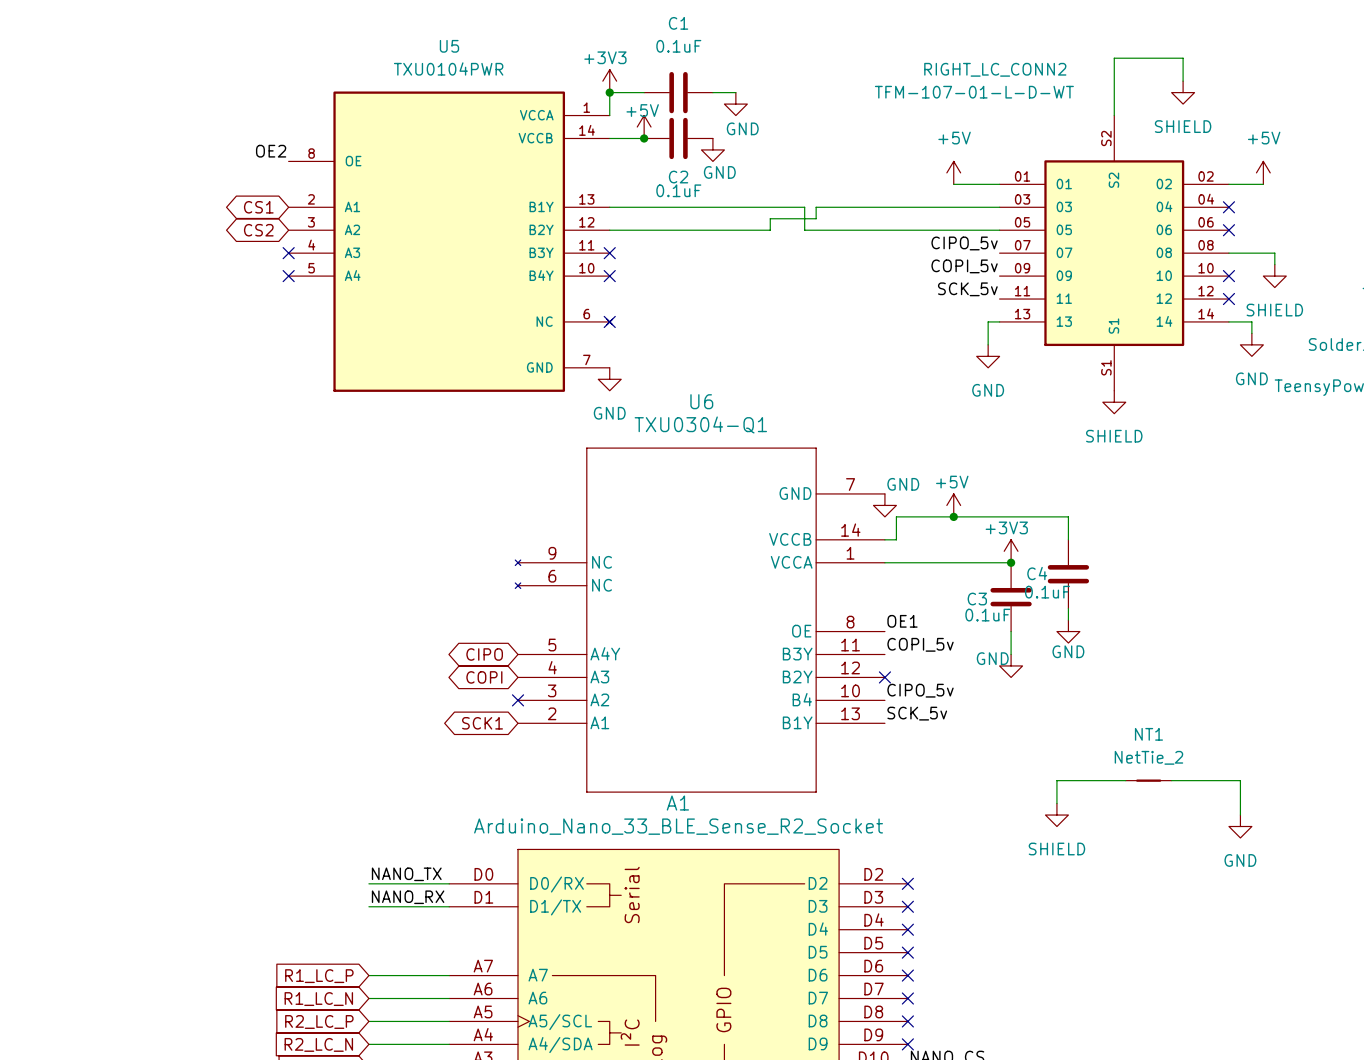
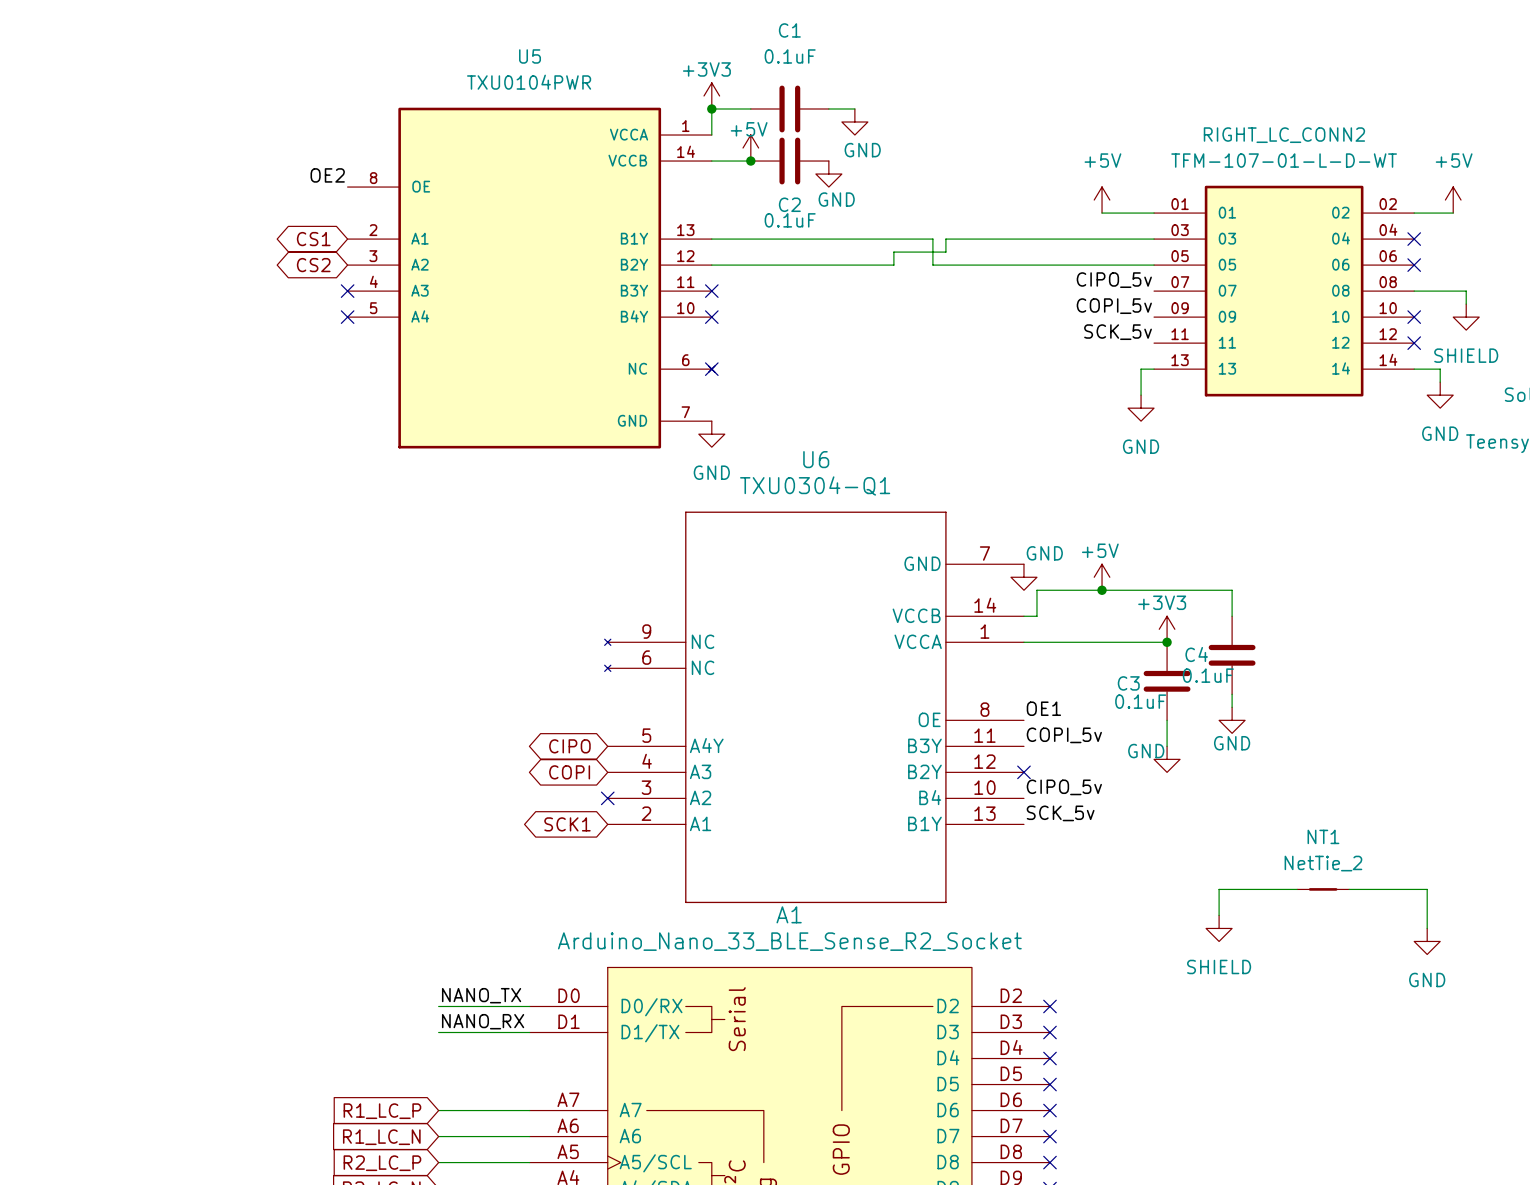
RIGHT_LC_CONN2 name position: RIGHT_LC_CONN2 (995, 69) -> RIGHT_LC_CONN2 (1284, 135)
wire: (1183, 81) (1183, 58) (1114, 58) (1114, 115) -> none
RIGHT_LC_CONN2 value position: TFM-107-01-L-D-WT (974, 92) -> TFM-107-01-L-D-WT (1284, 160)
power symbol: SHIELD (1183, 92) -> none
RIGHT_LC_CONN2 symbol: [999, 115, 1229, 391] -> [1154, 185, 1415, 397]
power symbol: SHIELD (1114, 402) -> none

